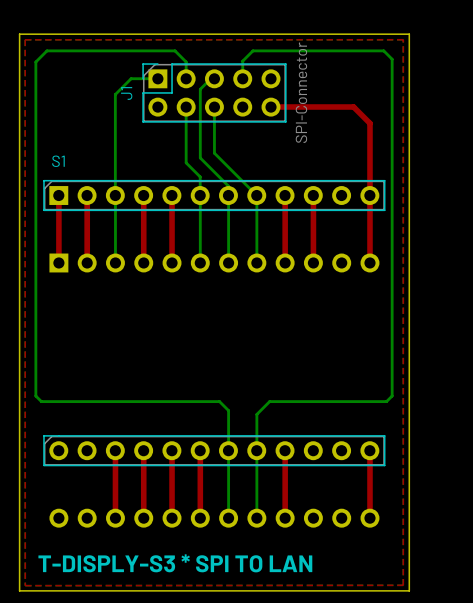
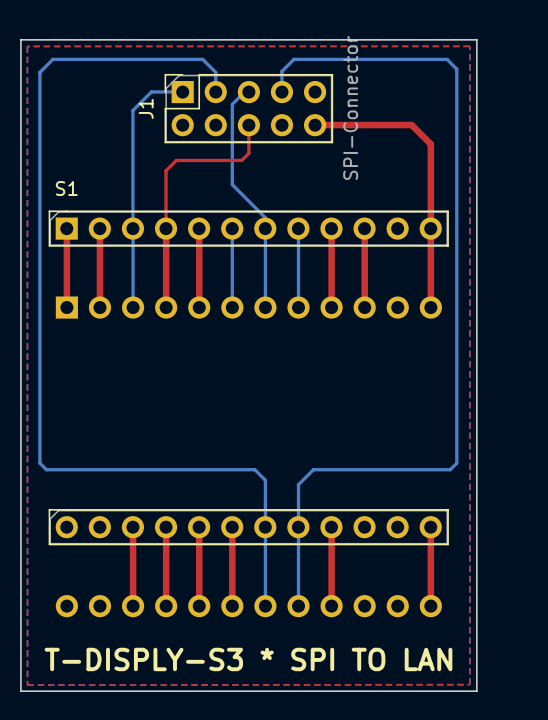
bottom track: (186, 106) (186, 162) (200, 176) (200, 195) -> none
bottom track: (214, 106) (214, 153) (256, 195) -> none
top track: none -> (248, 125) (248, 153) (241, 160) (176, 160) (166, 170) (166, 228)

